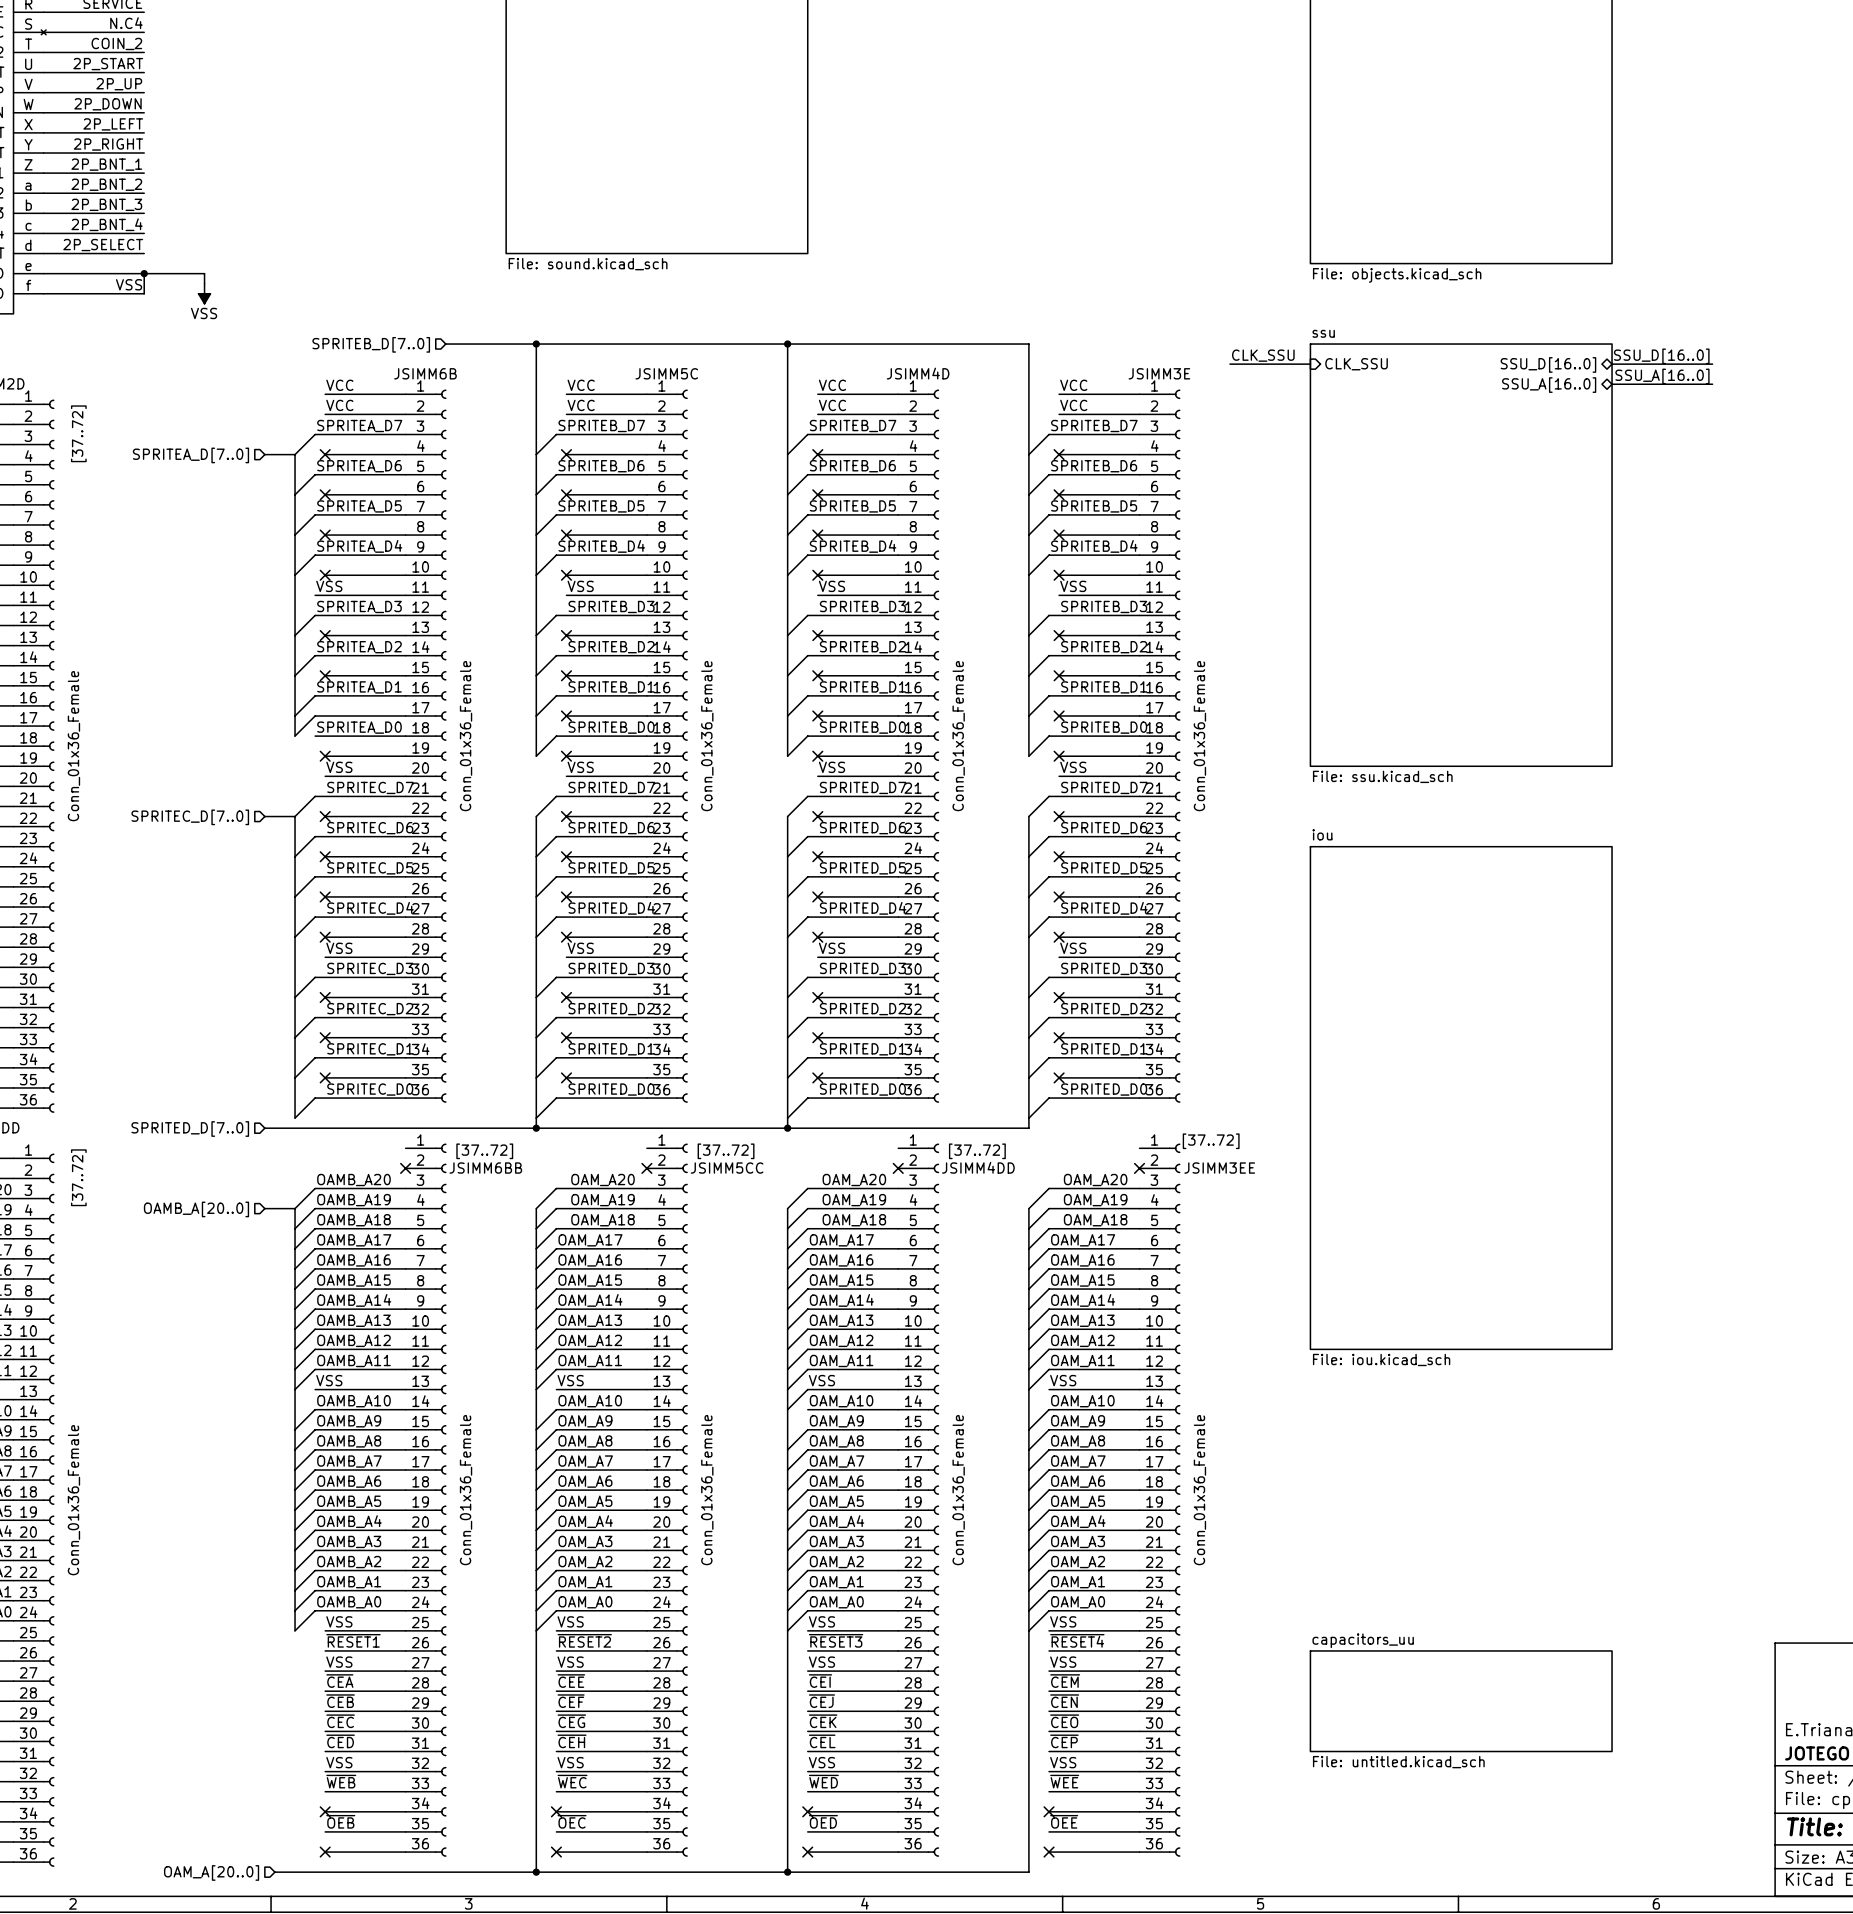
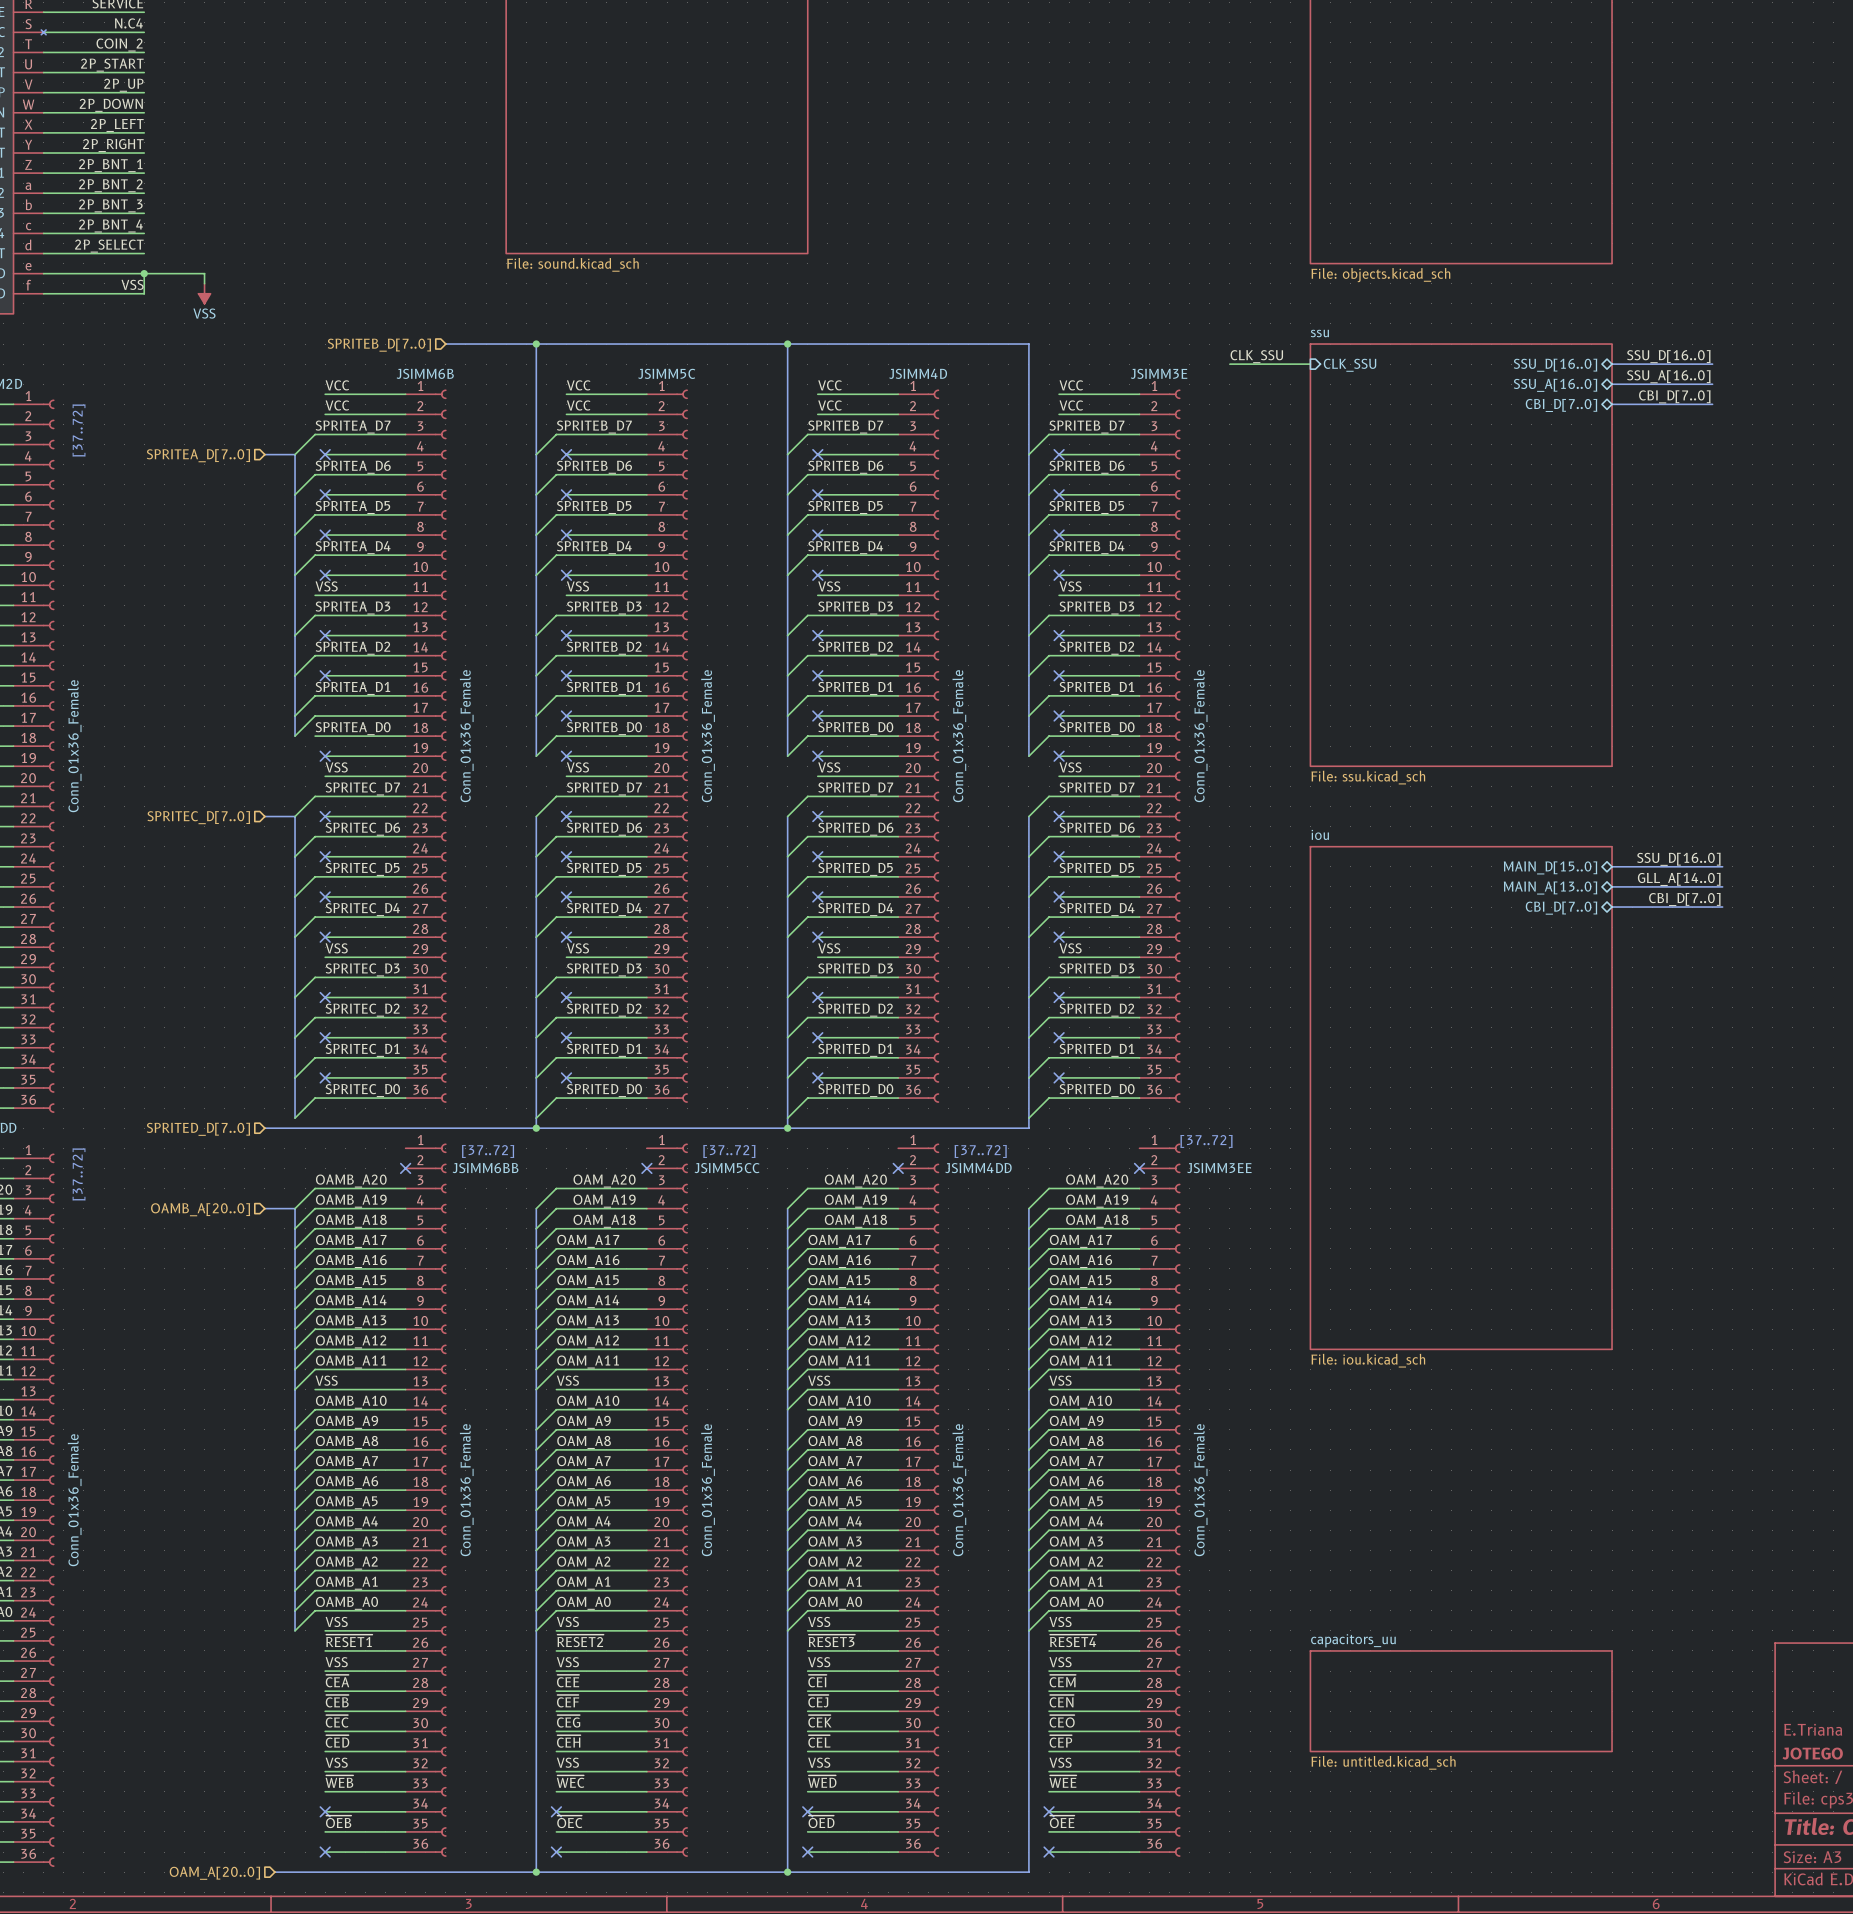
label: none -> CBI_D[7..0] (1674, 396)
bus: none -> (1612, 404) (1712, 404)
sheet pin: none -> CBI_D[7..0] (1561, 405)
label: none -> SSU_D[16..0] (1678, 859)
bus: none -> (1612, 866) (1722, 866)
sheet pin: none -> MAIN_D[15..0] (1550, 867)
label: none -> GLL_A[14..0] (1679, 879)
bus: none -> (1612, 886) (1722, 886)
sheet pin: none -> MAIN_A[13..0] (1550, 888)
label: none -> CBI_D[7..0] (1684, 899)
sheet pin: none -> CBI_D[7..0] (1561, 908)
bus: none -> (1612, 907) (1722, 907)

